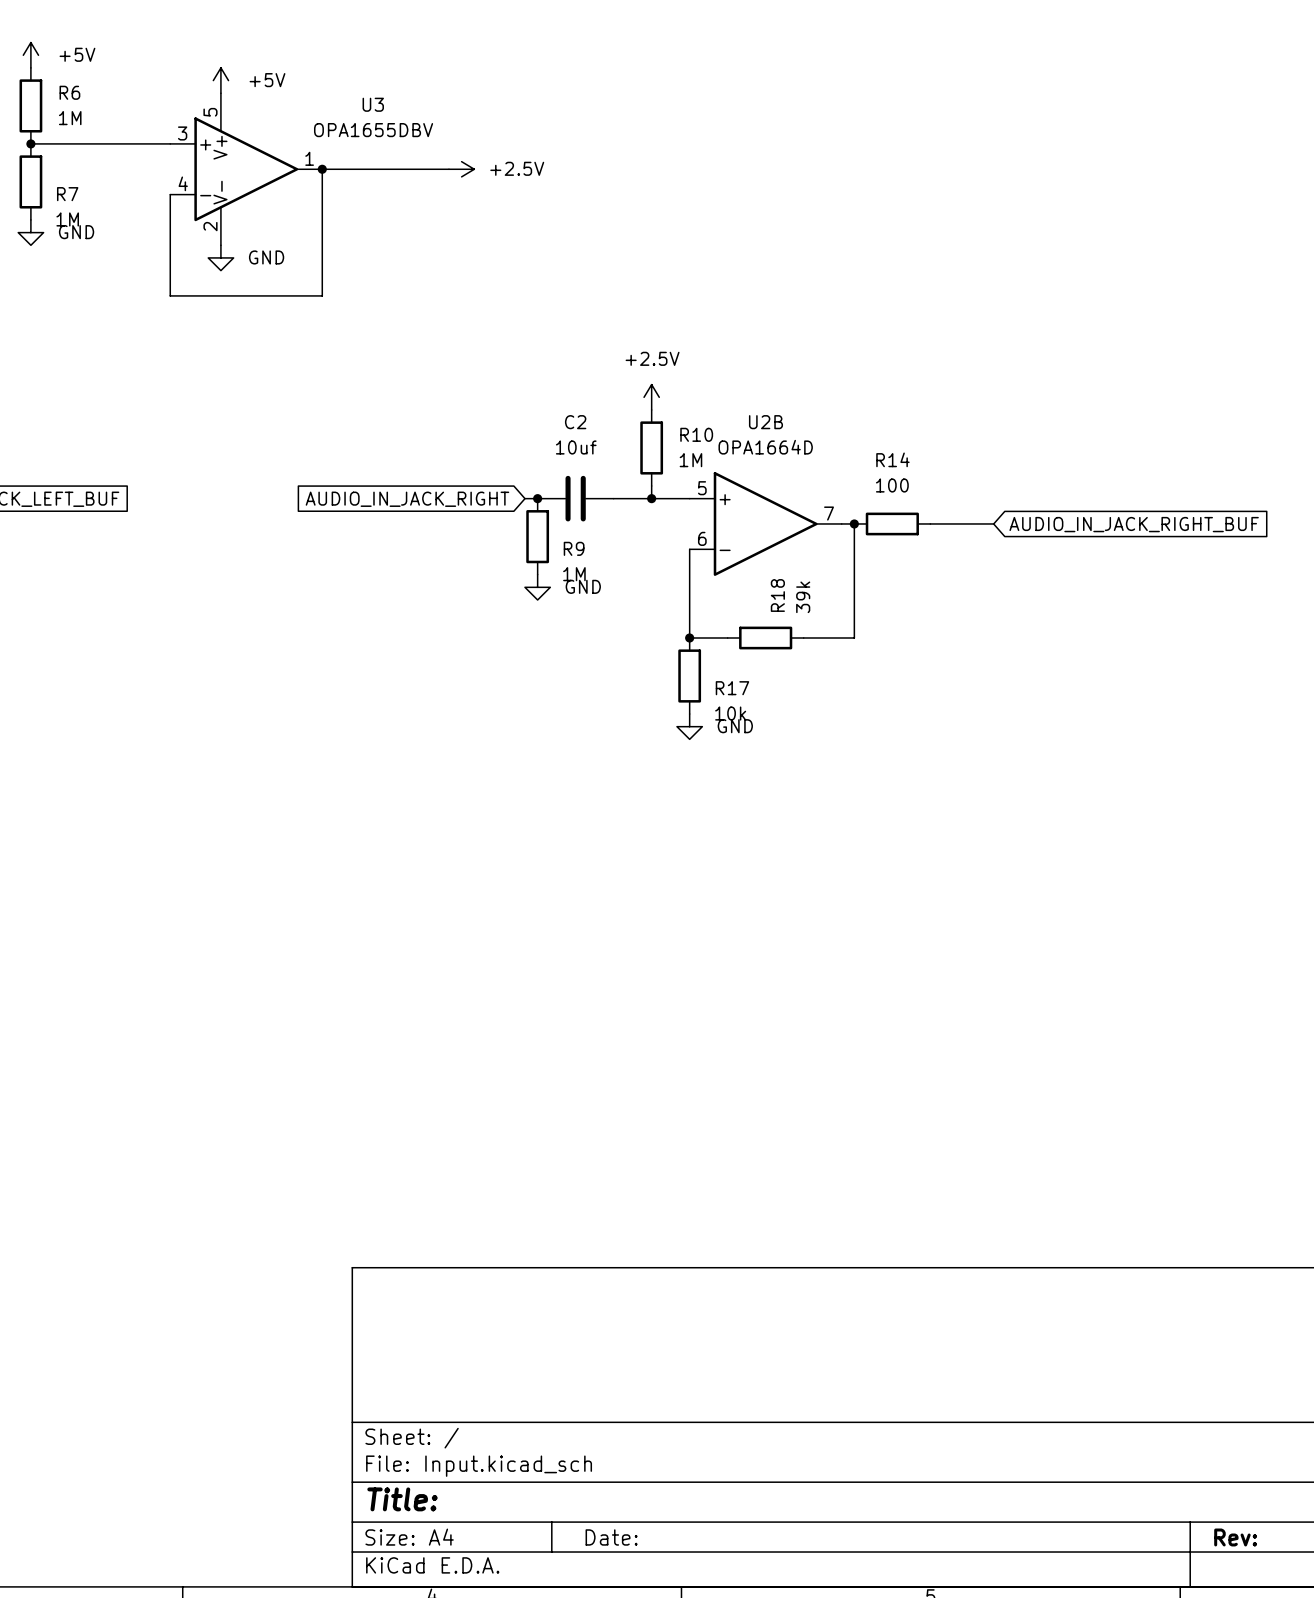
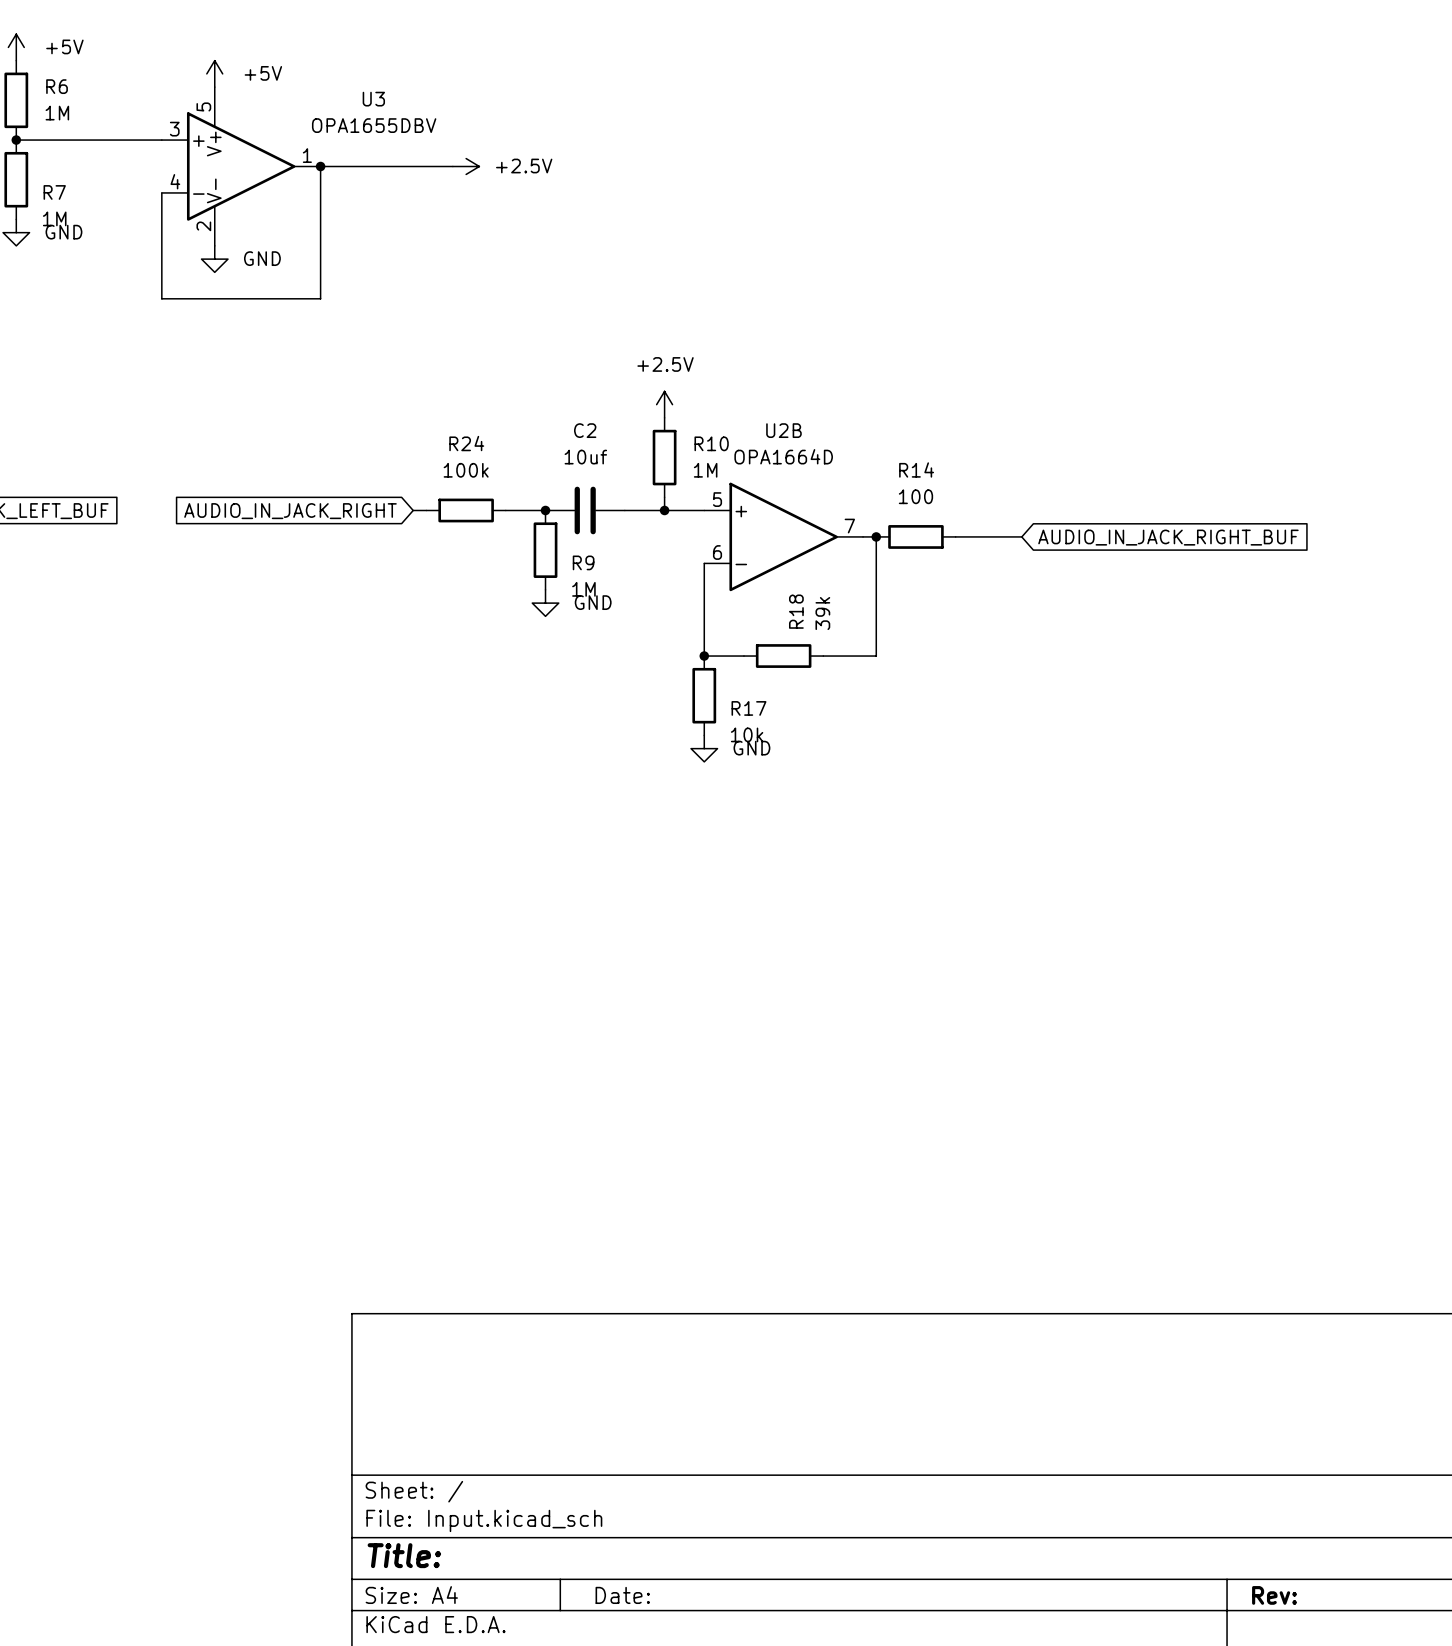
wire: none -> (413, 510) (426, 510)
R24: none -> 100k (466, 510)
wire: none -> (505, 510) (532, 510)
global label position: AUDIO_IN_JACK_RIGHT (407, 499) -> AUDIO_IN_JACK_RIGHT (290, 511)

